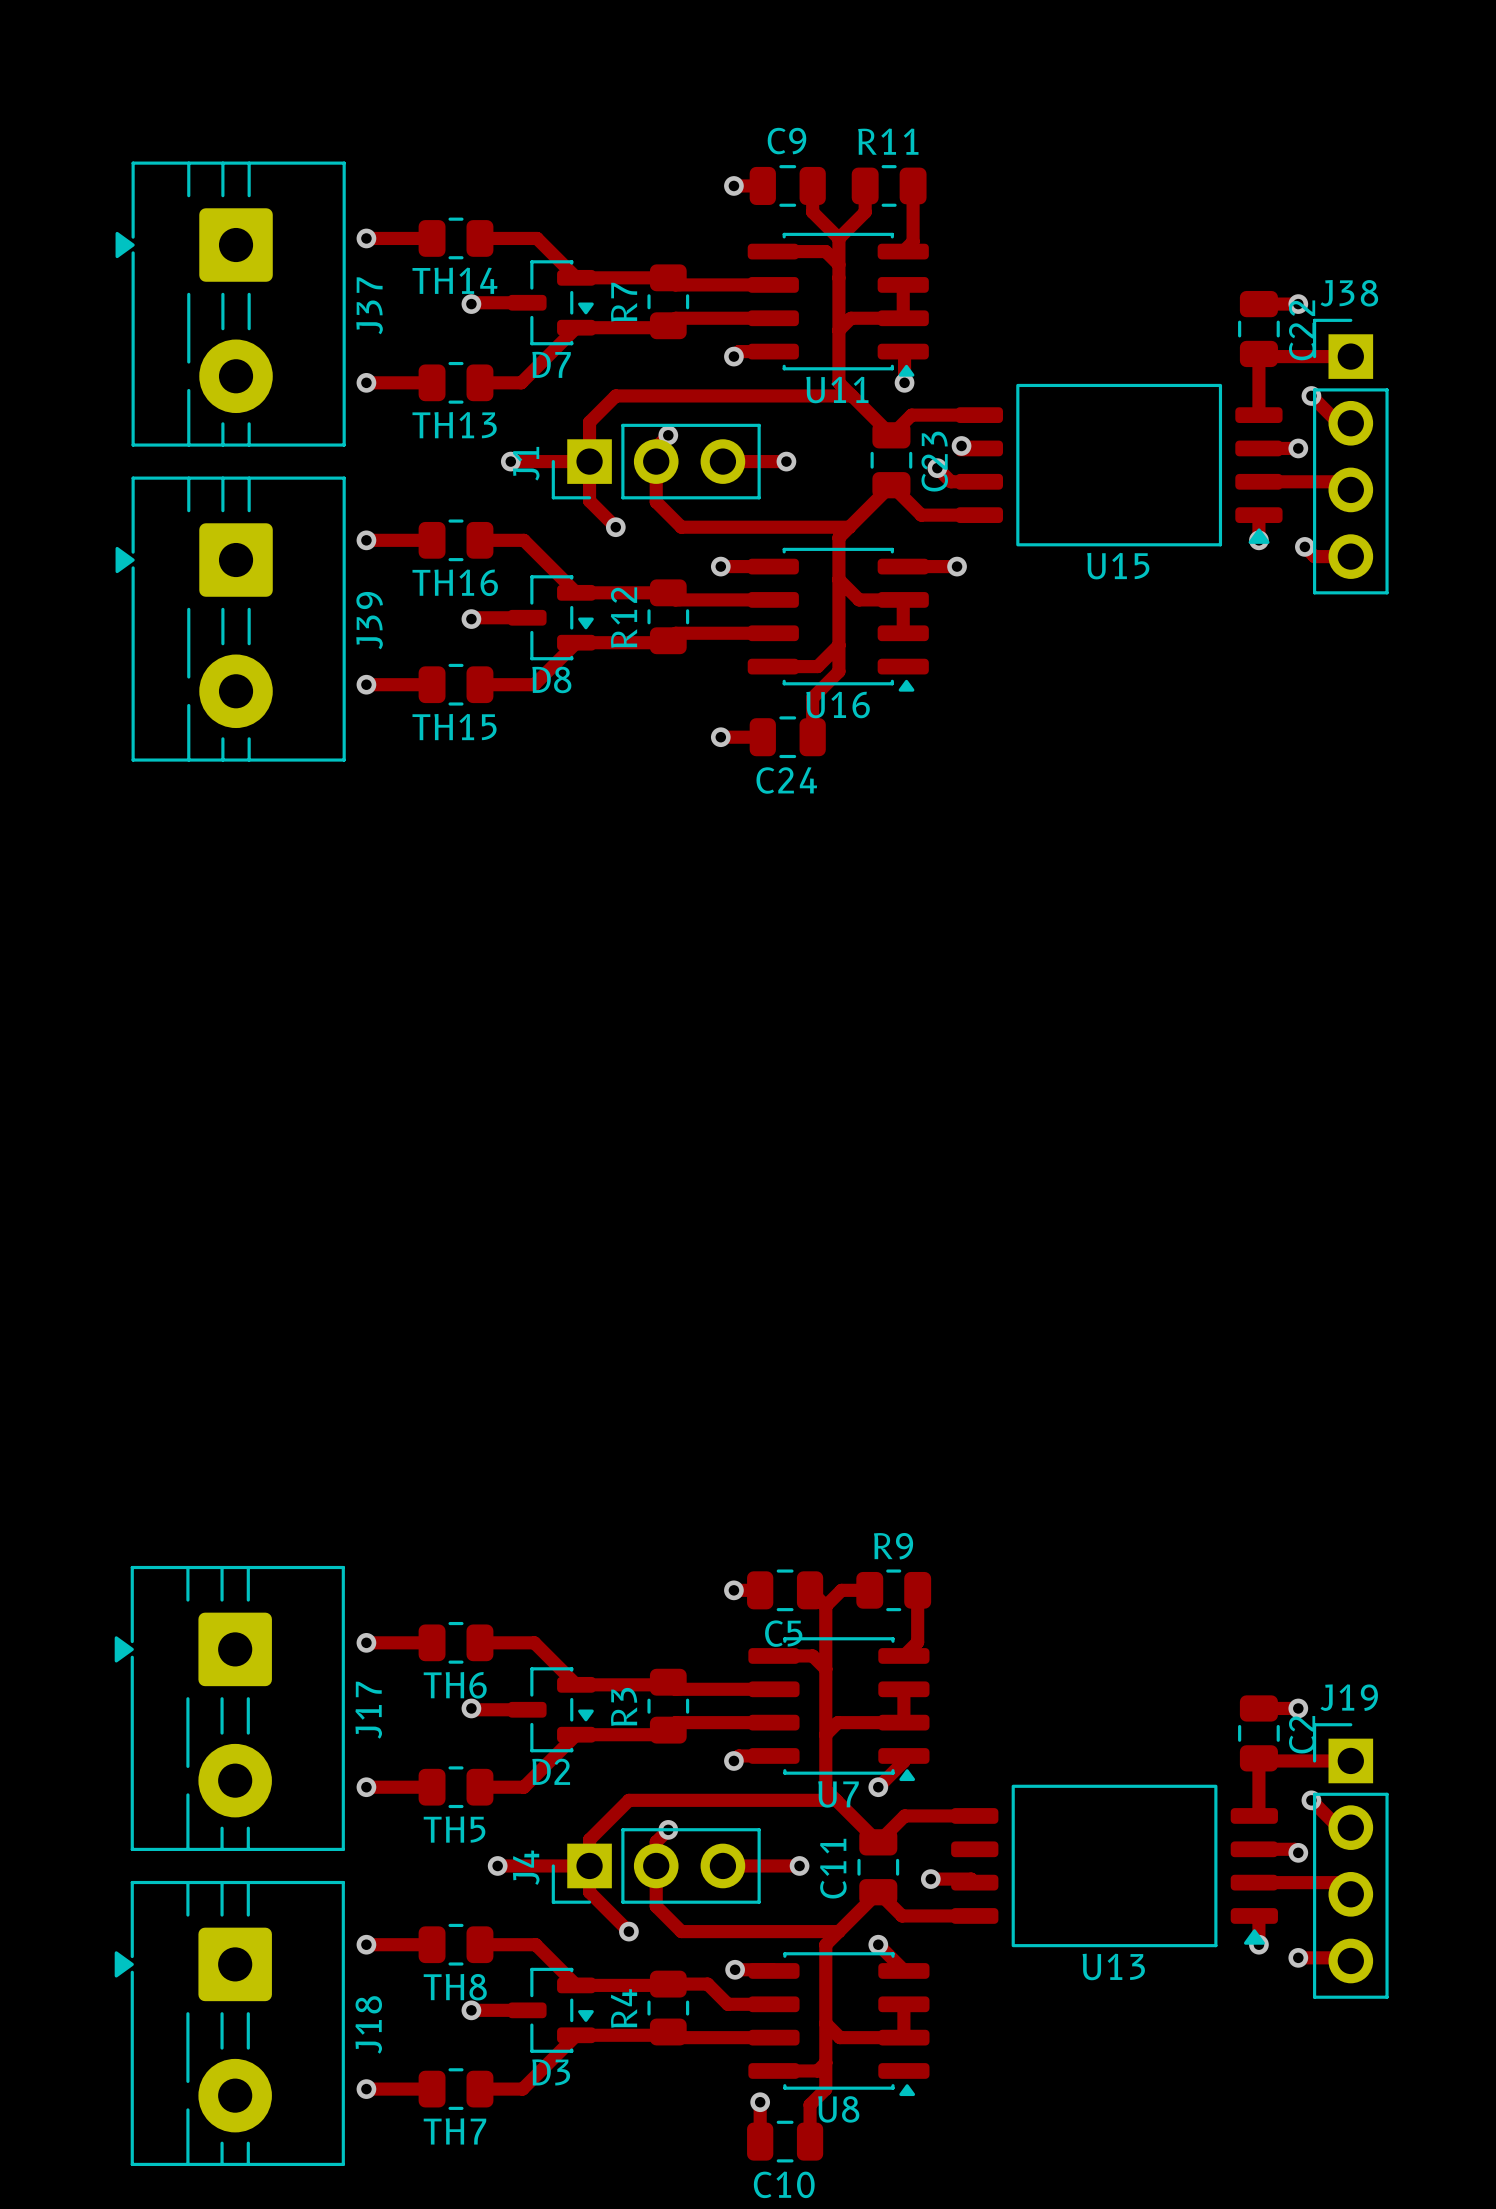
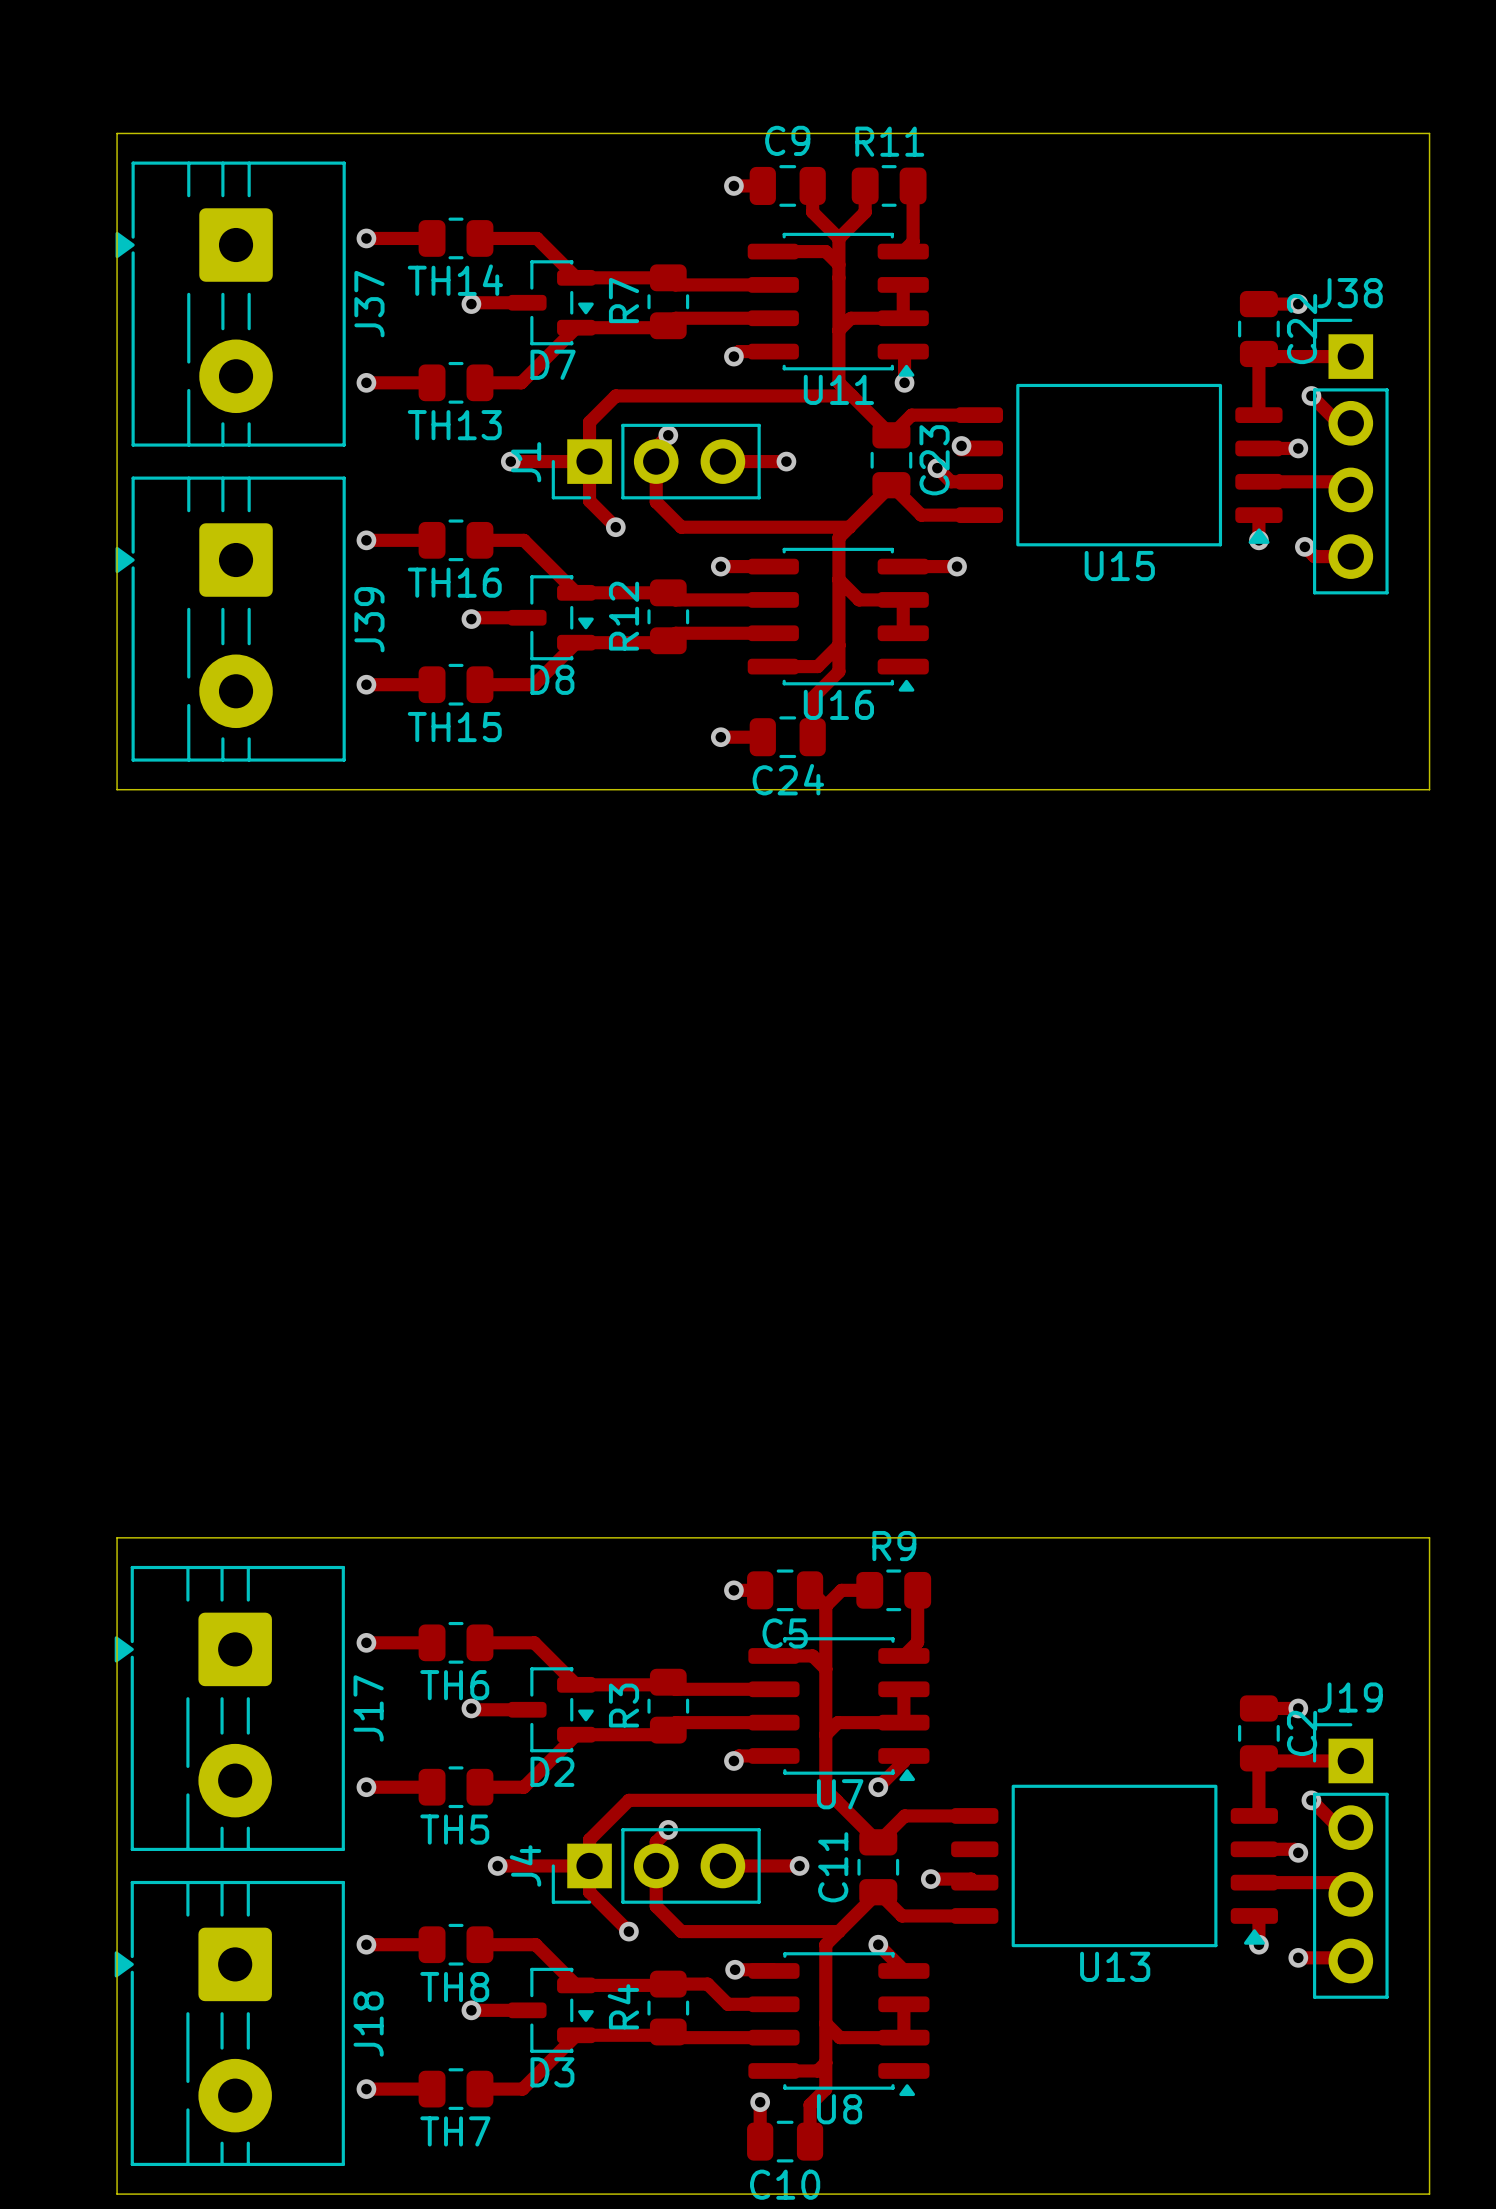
board edge: none -> (117, 133) (1429, 133) (1429, 789) (117, 789) (117, 133)
board edge: none -> (117, 1537) (117, 2194) (1429, 2194) (1429, 1537) (117, 1537)

